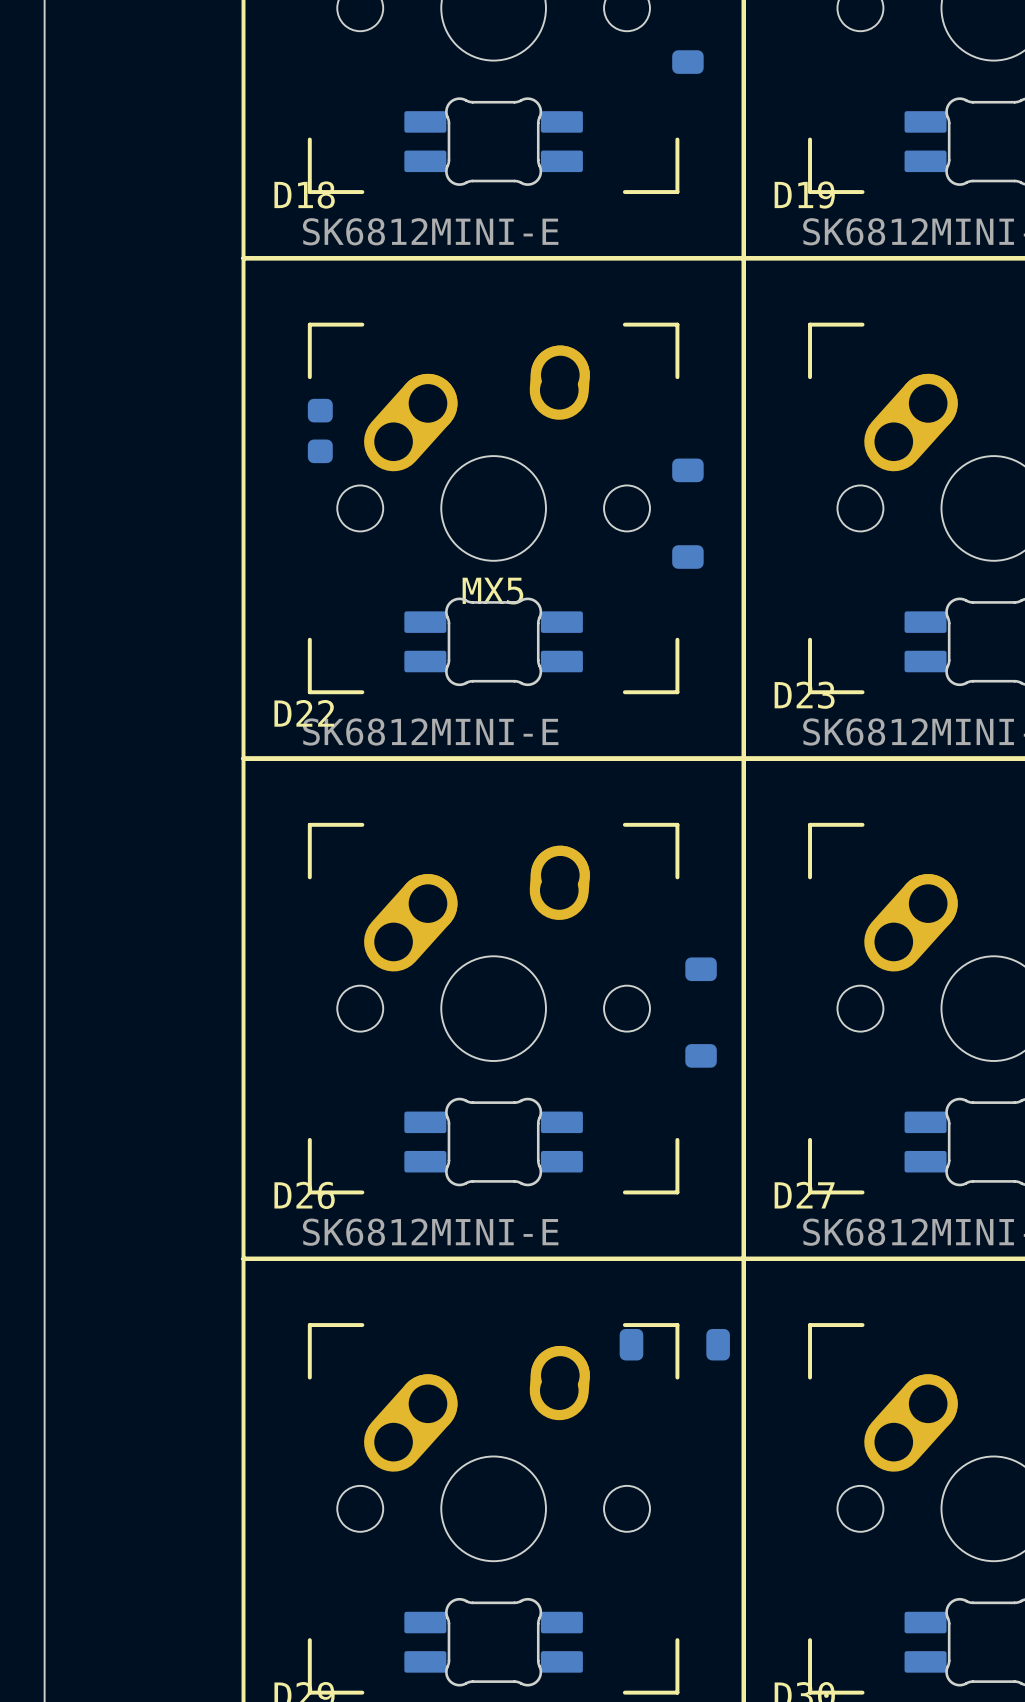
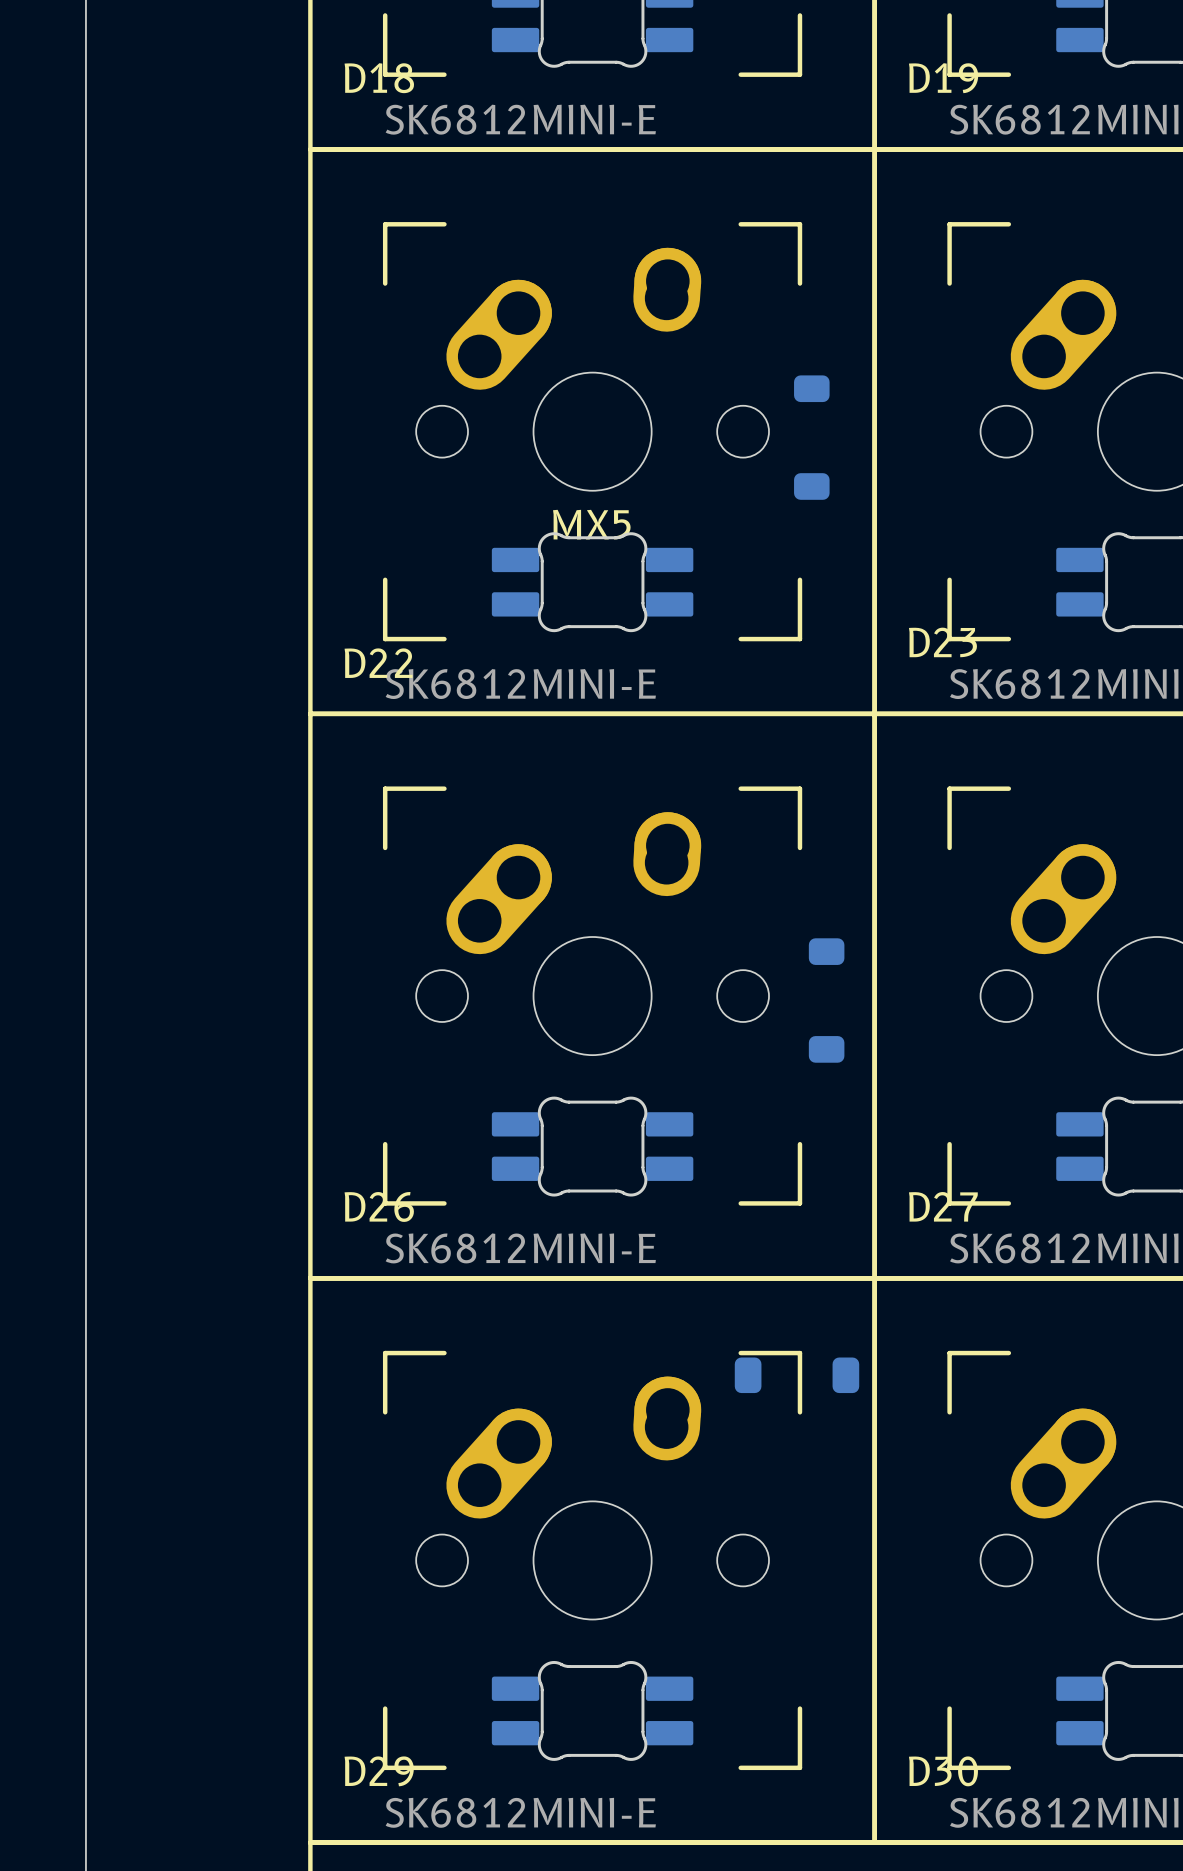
part: (320, 430) -> none

